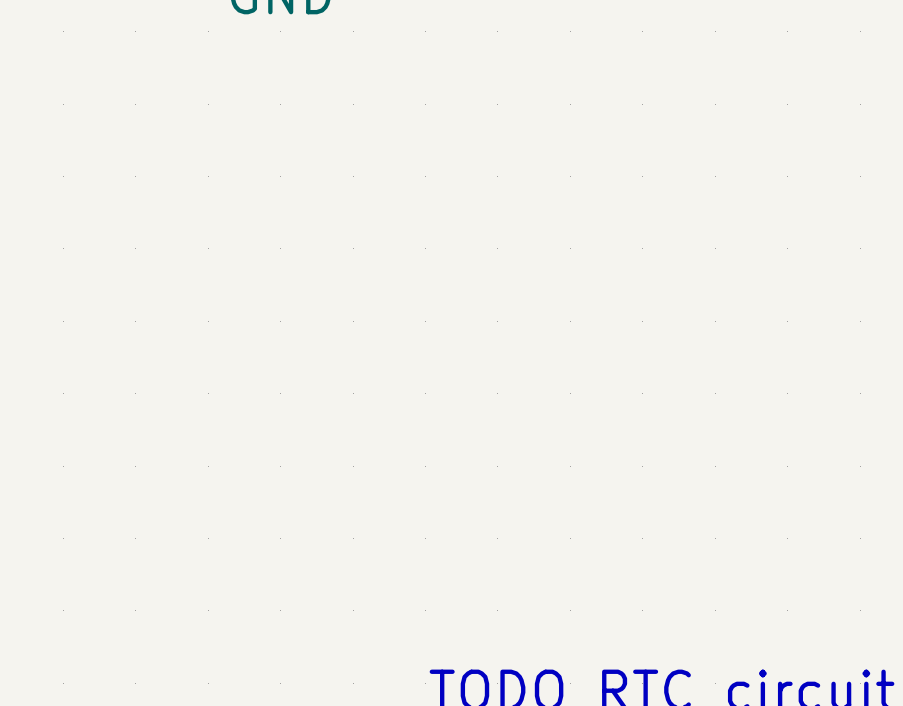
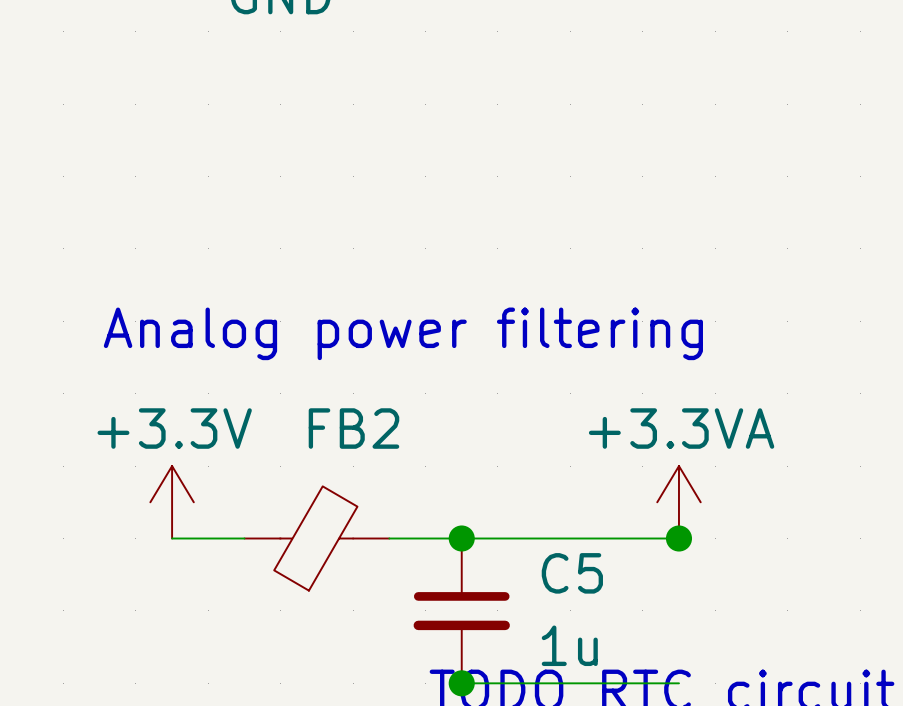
text: none -> Analog power filtering (403, 333)
power symbol: none -> +3.3V (172, 502)
power symbol: none -> +3.3VA (678, 502)
wire: none -> (172, 538) (244, 538)
FB2: none -> (316, 538)
wire: none -> (389, 538) (678, 538)
junction: none -> (461, 538)
junction: none -> (678, 538)
C5: none -> 1u (461, 610)
wire: none -> (461, 683) (678, 683)
junction: none -> (461, 683)

